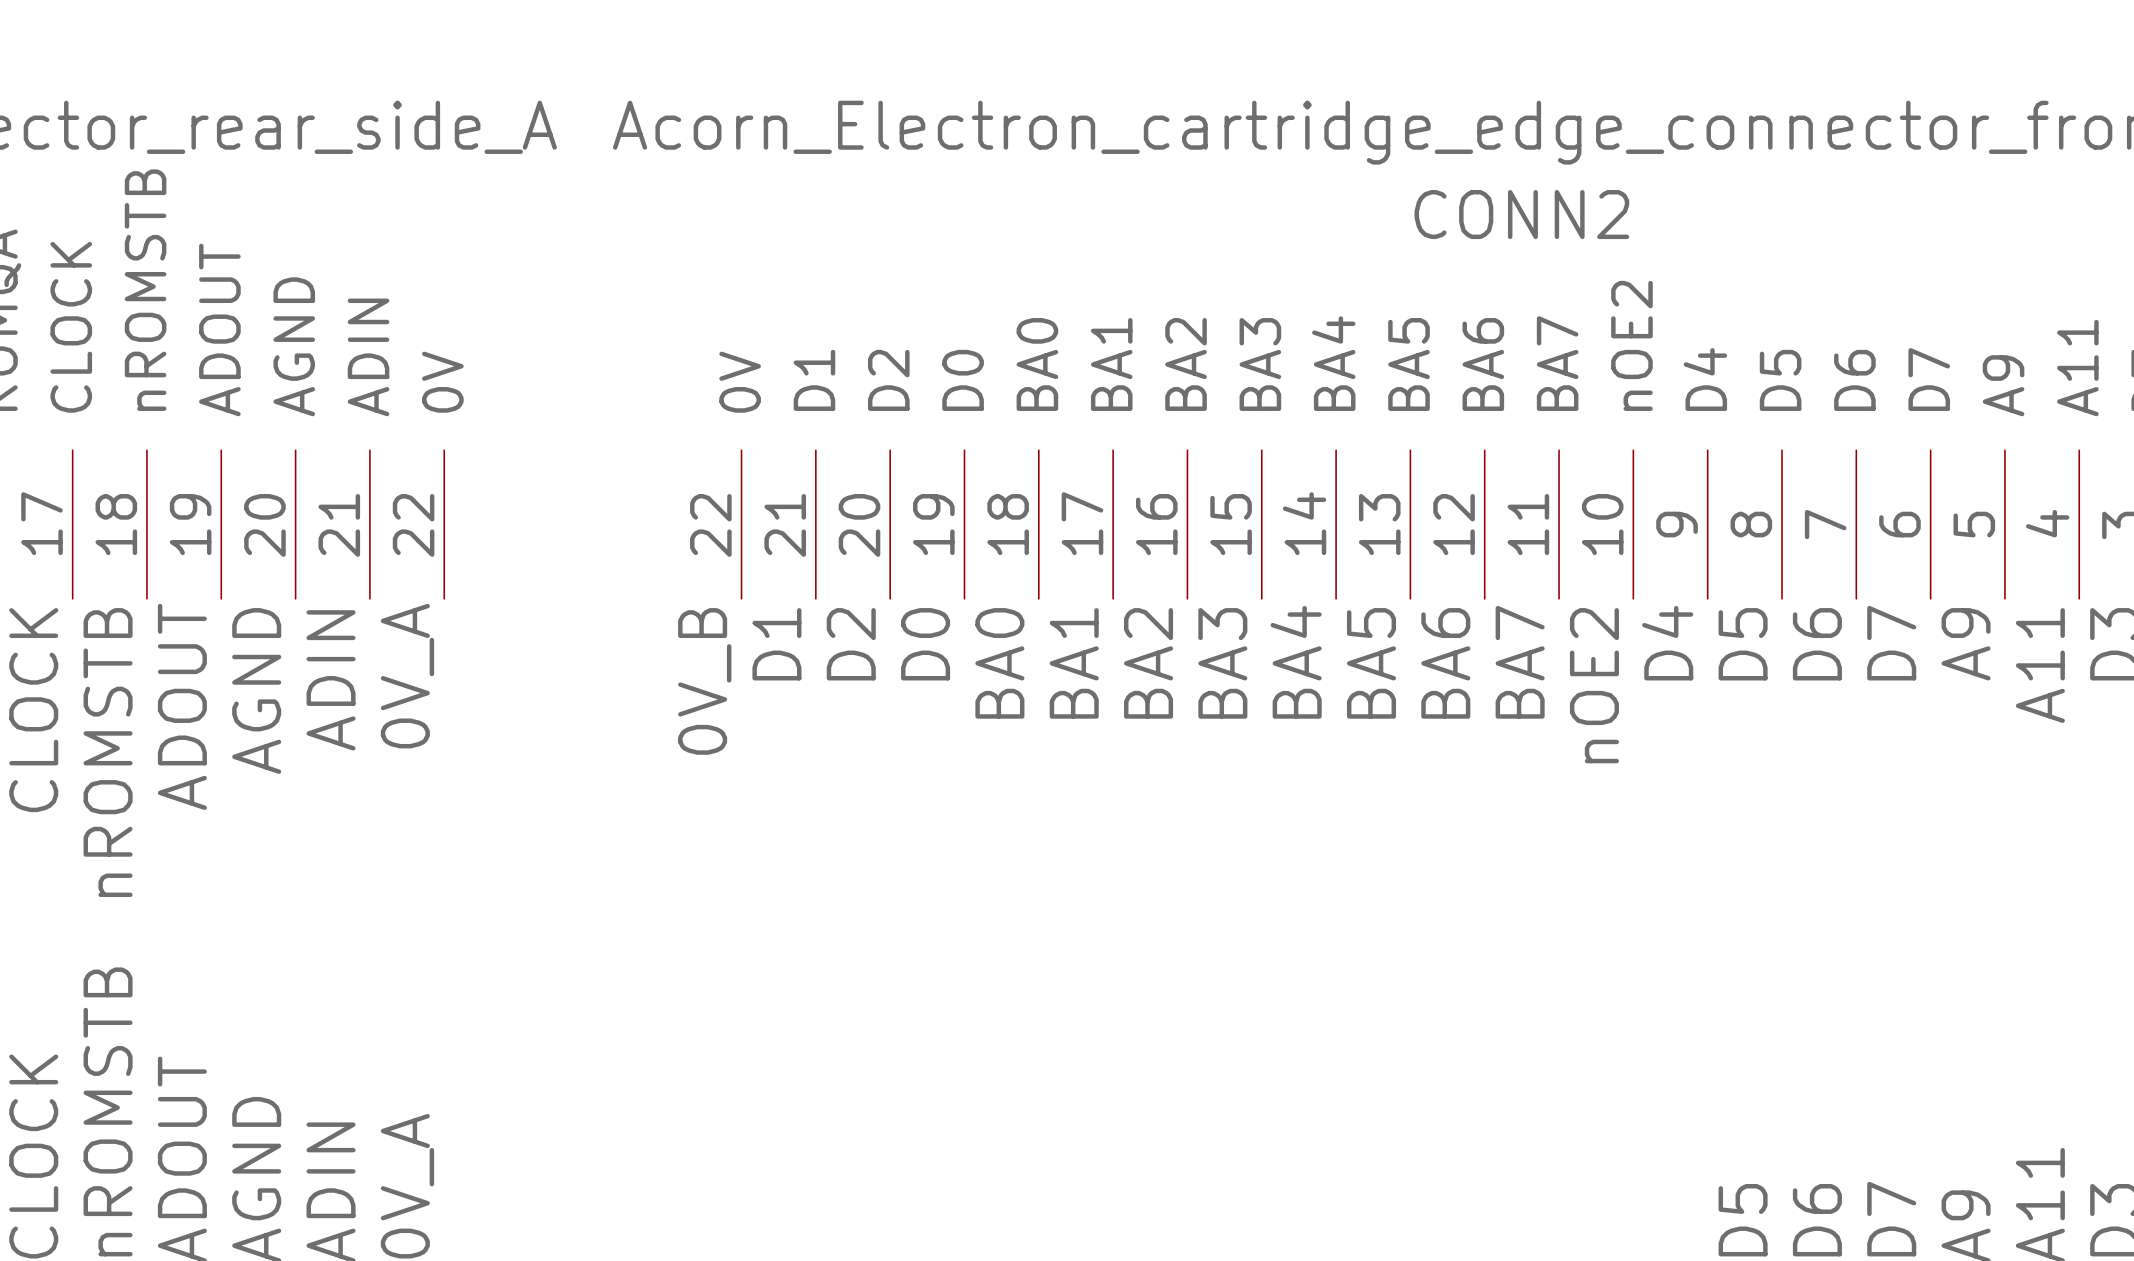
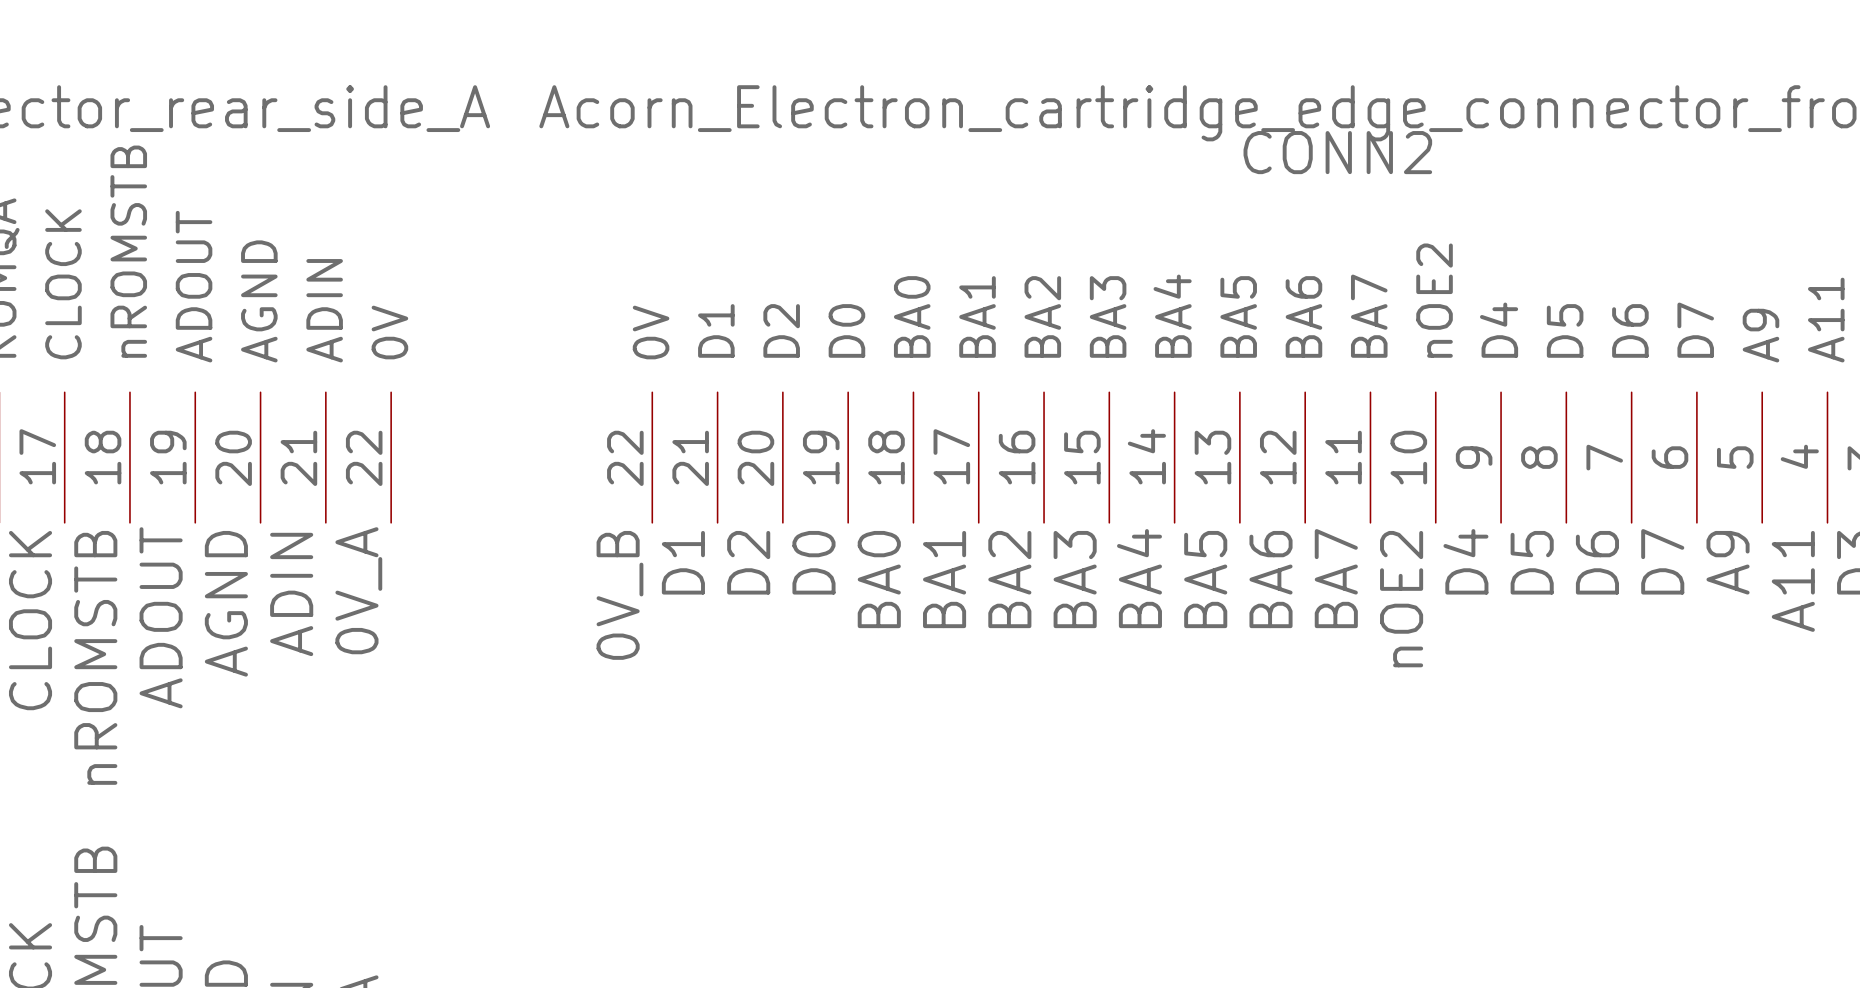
CONN2 name position: CONN2 (1521, 214) -> CONN2 (1337, 152)

